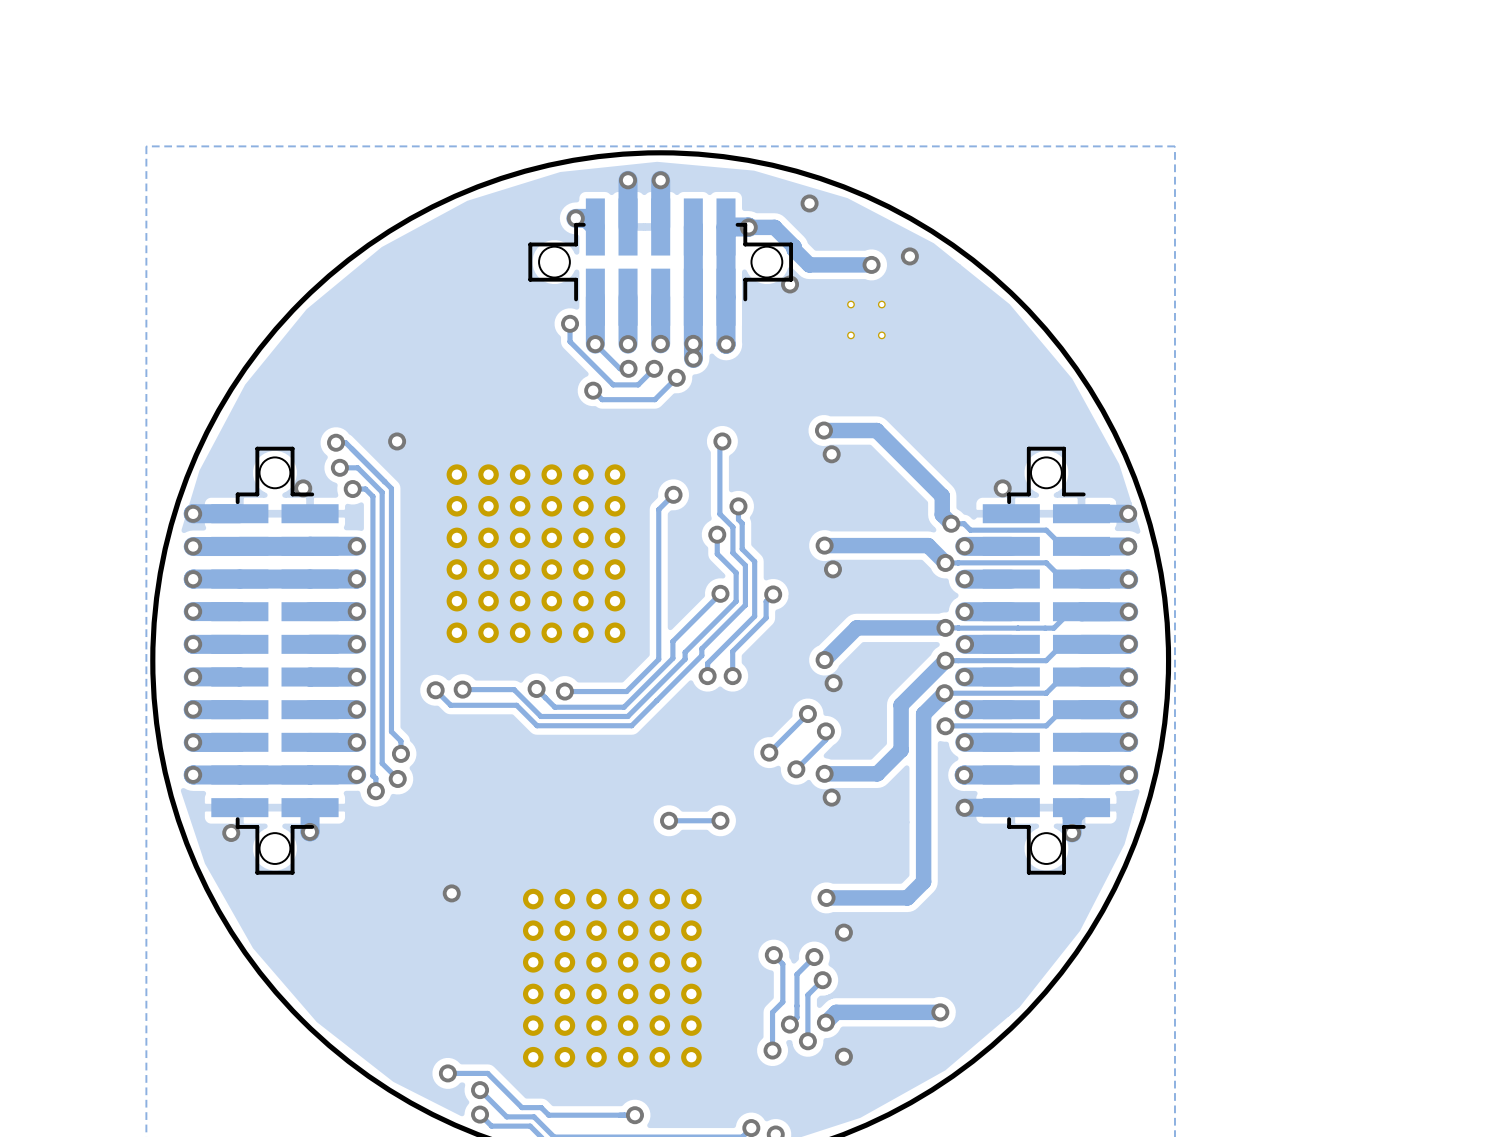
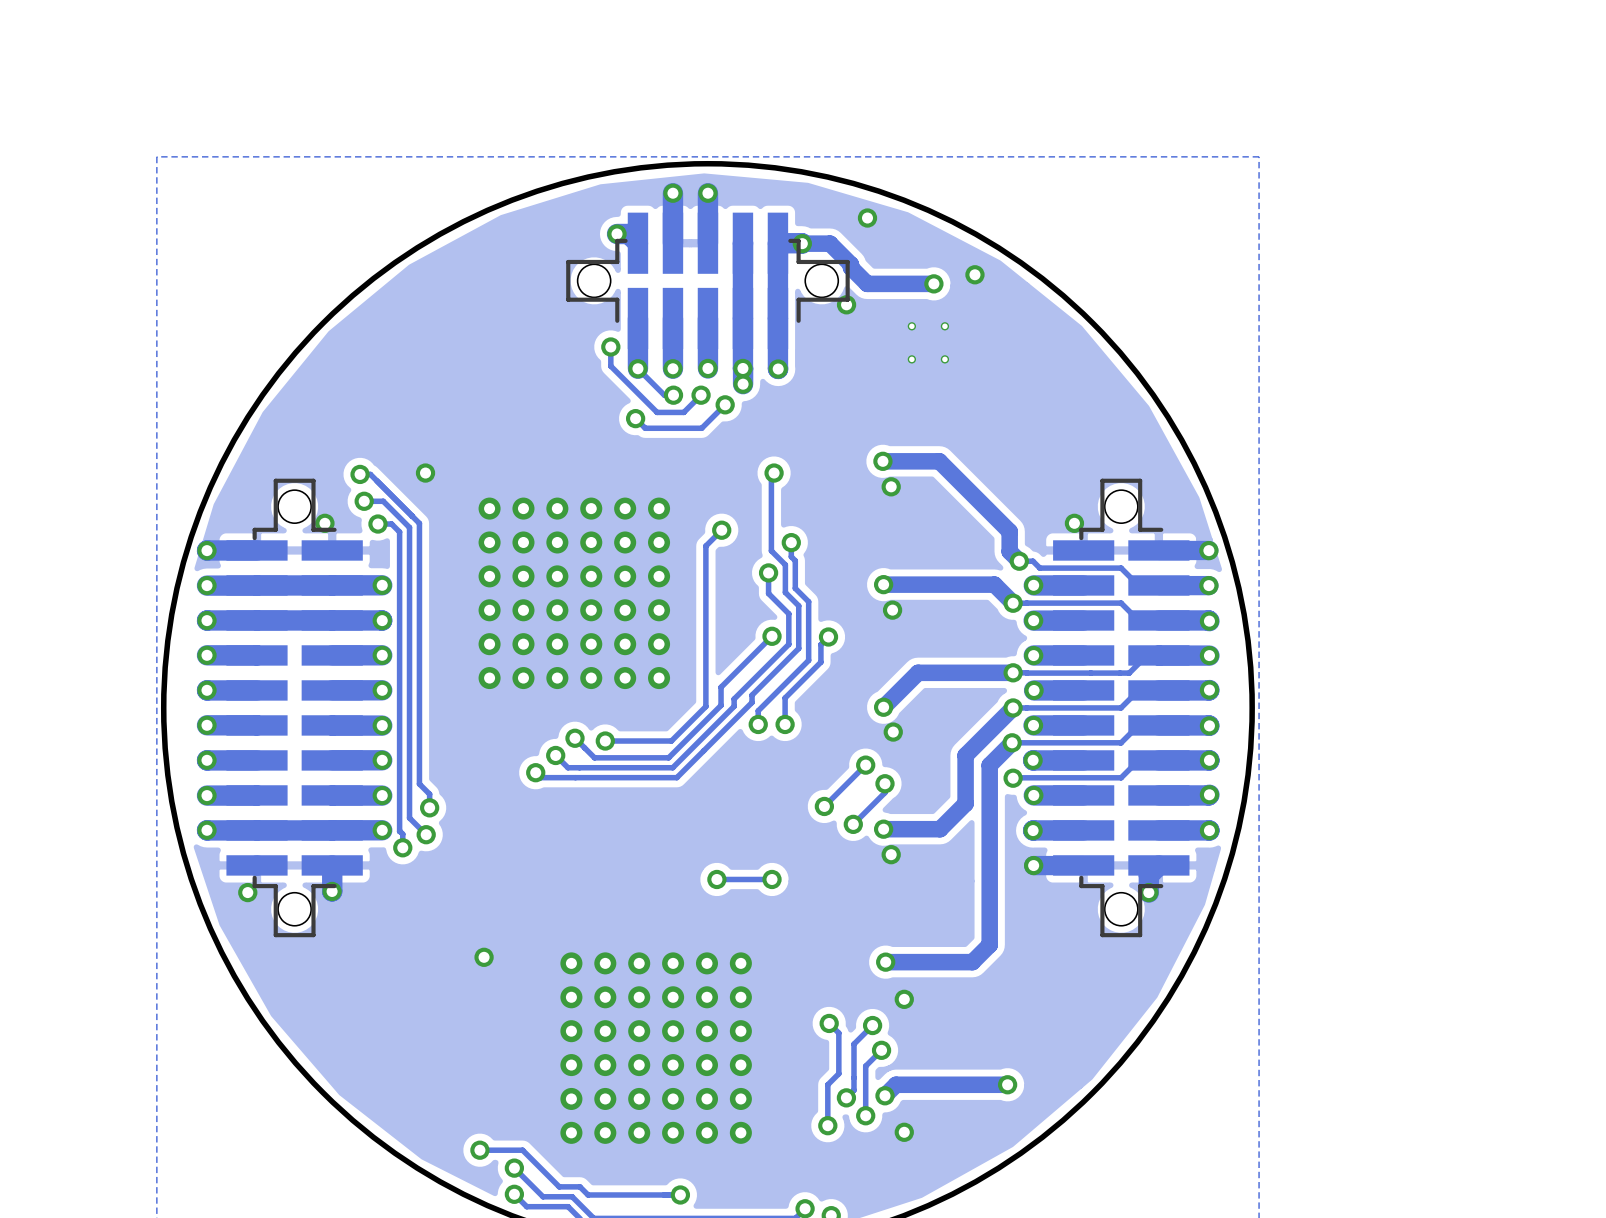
track: (462, 689) (514, 689) (540, 716) -> (555, 755) (567, 767) (579, 767)
via: (462, 689) -> none
track: (435, 690) (450, 705) (516, 705) (537, 725) -> (535, 772) (540, 777) (575, 777)
via: (435, 690) -> none
via: none -> (555, 755)
via: none -> (535, 772)

